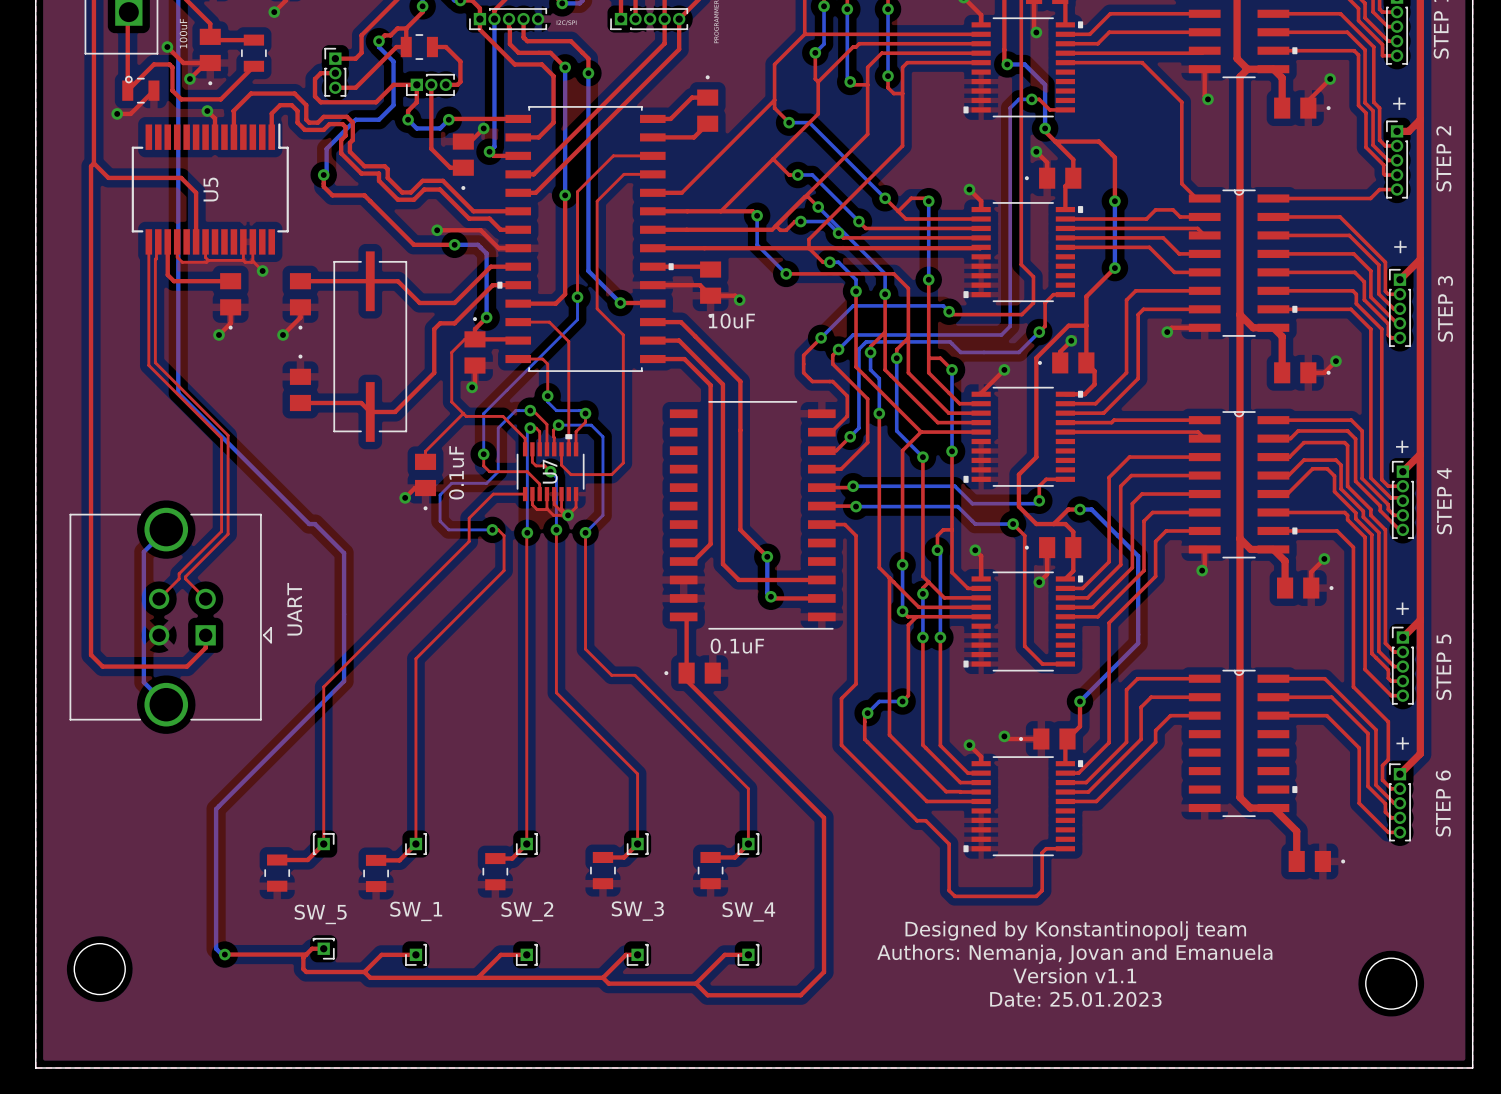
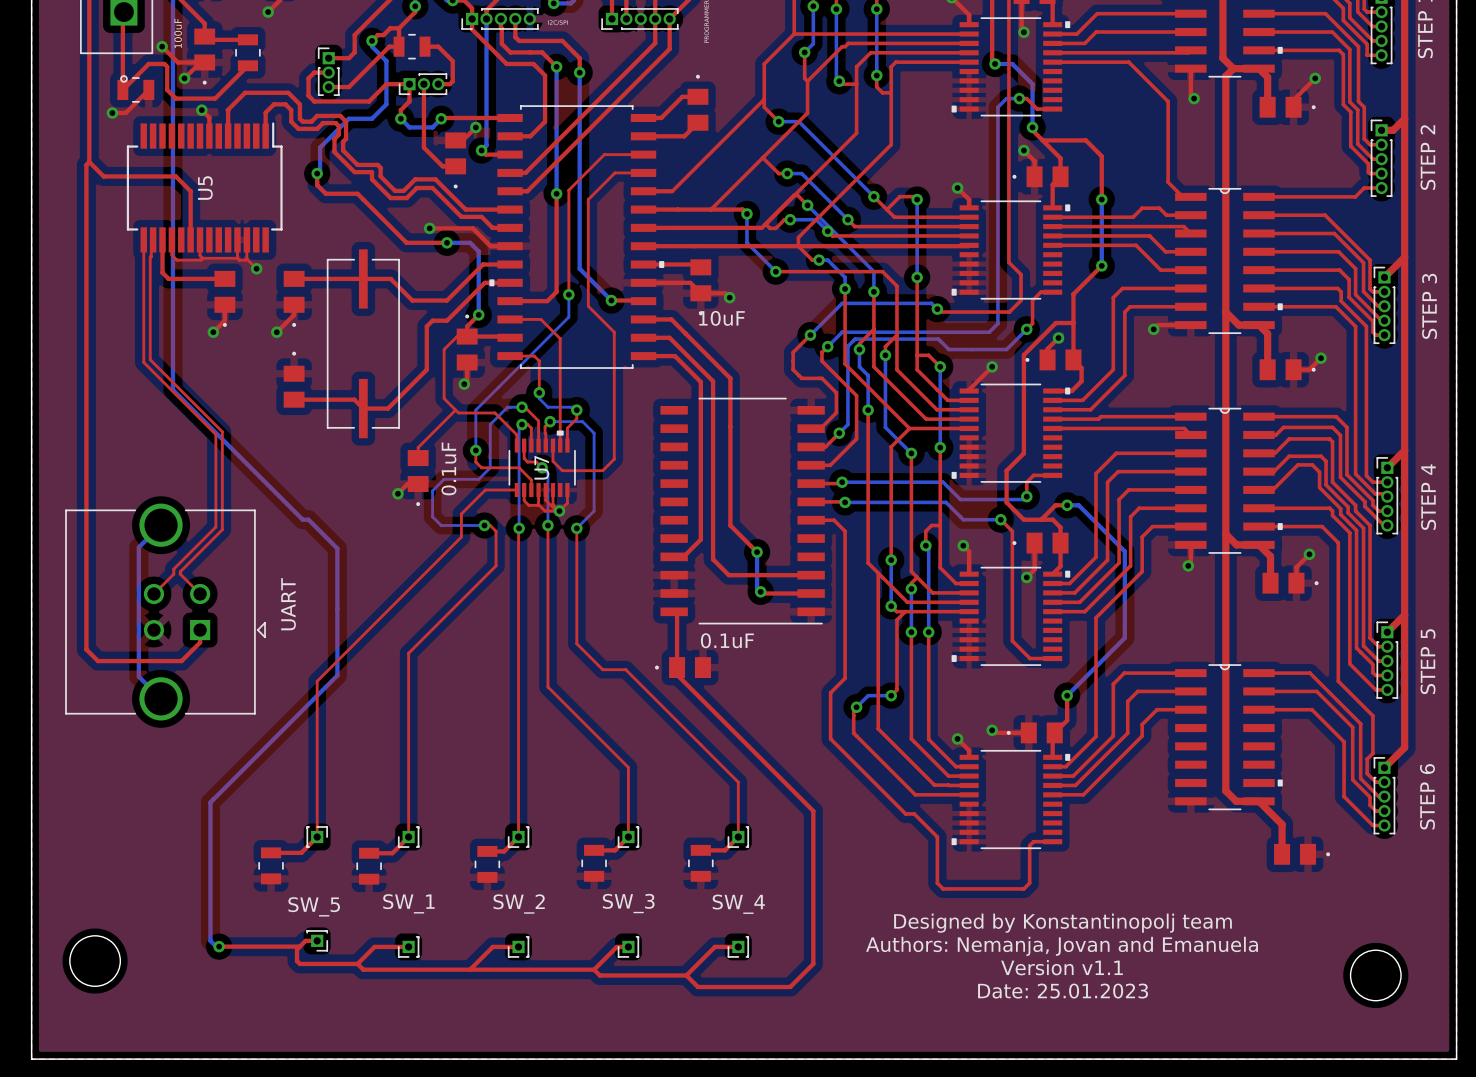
text: + (1399, 103) -> none
text: + (1400, 246) -> none
text: + (1402, 446) -> none
text: + (1402, 608) -> none
text: + (1402, 743) -> none

